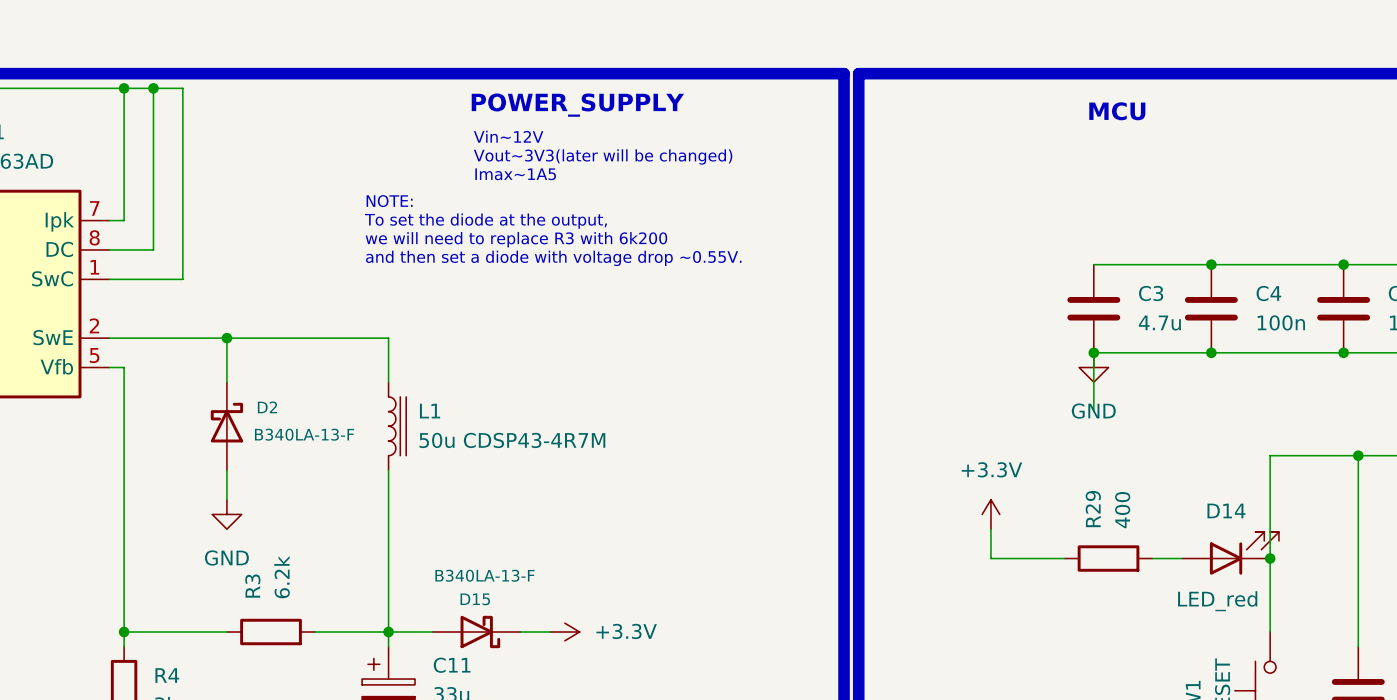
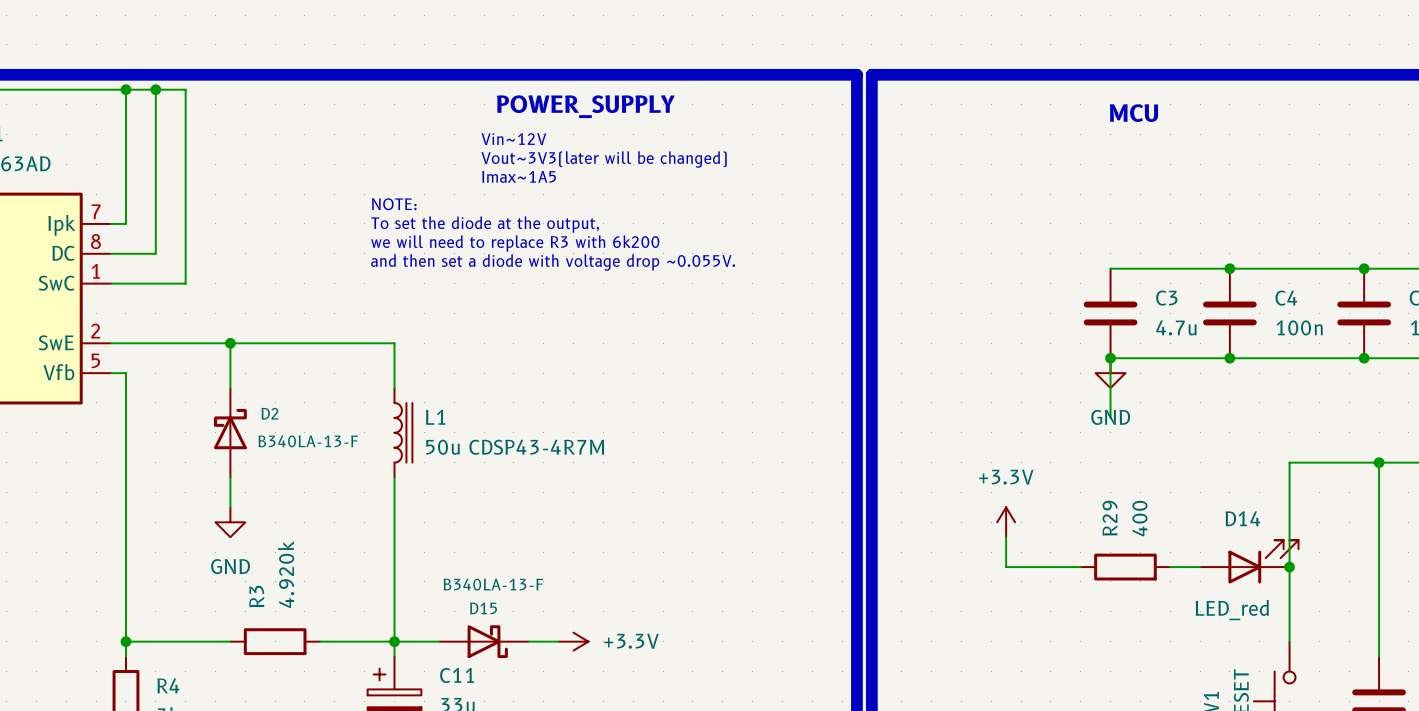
text: and then set a diode with voltage drop ~0.55V. (553, 258) -> and then set a diode with voltage drop ~0.055V. (553, 262)
R3 value: 6.2k (282, 577) -> 4.920k (286, 574)

